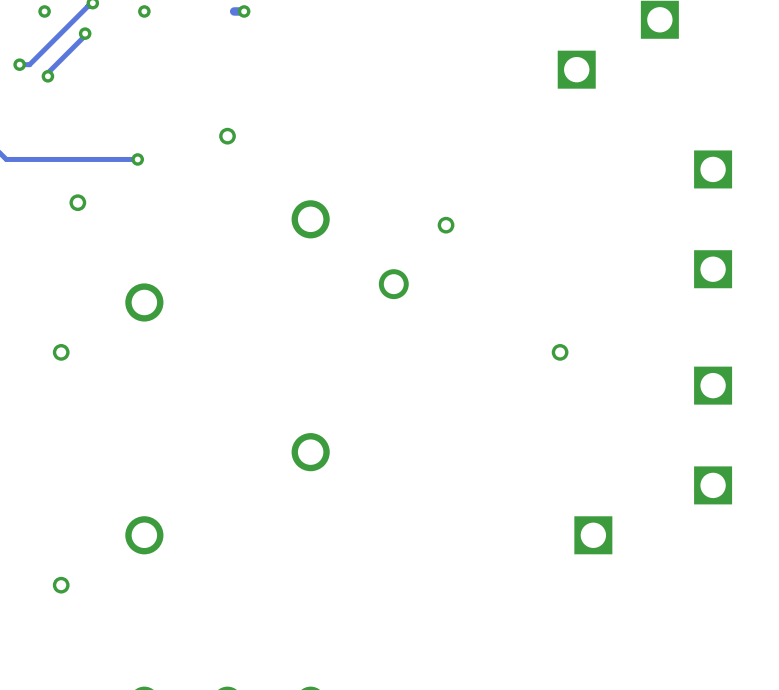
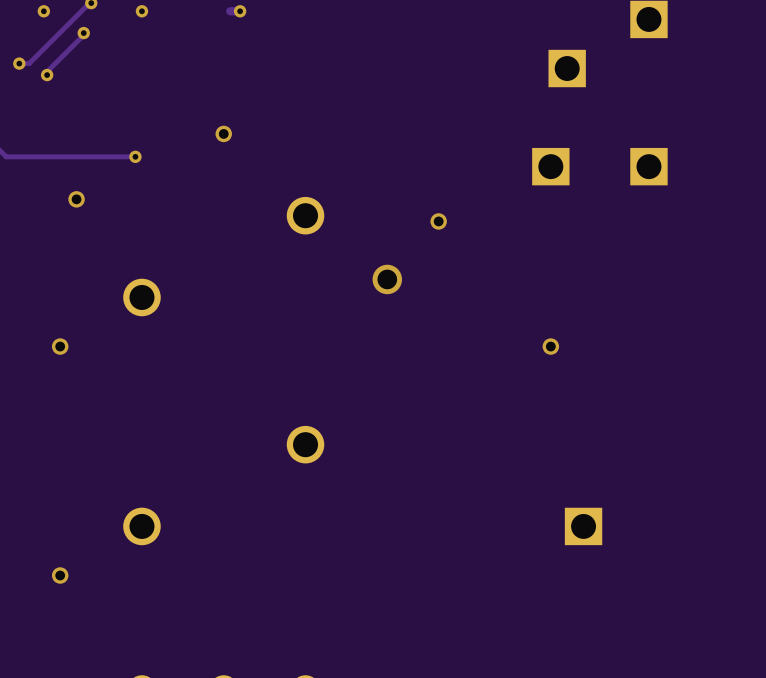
part: none -> (550, 166)
part position: (713, 169) -> (648, 166)
part: (713, 269) -> none
part: (713, 385) -> none
part: (713, 485) -> none

